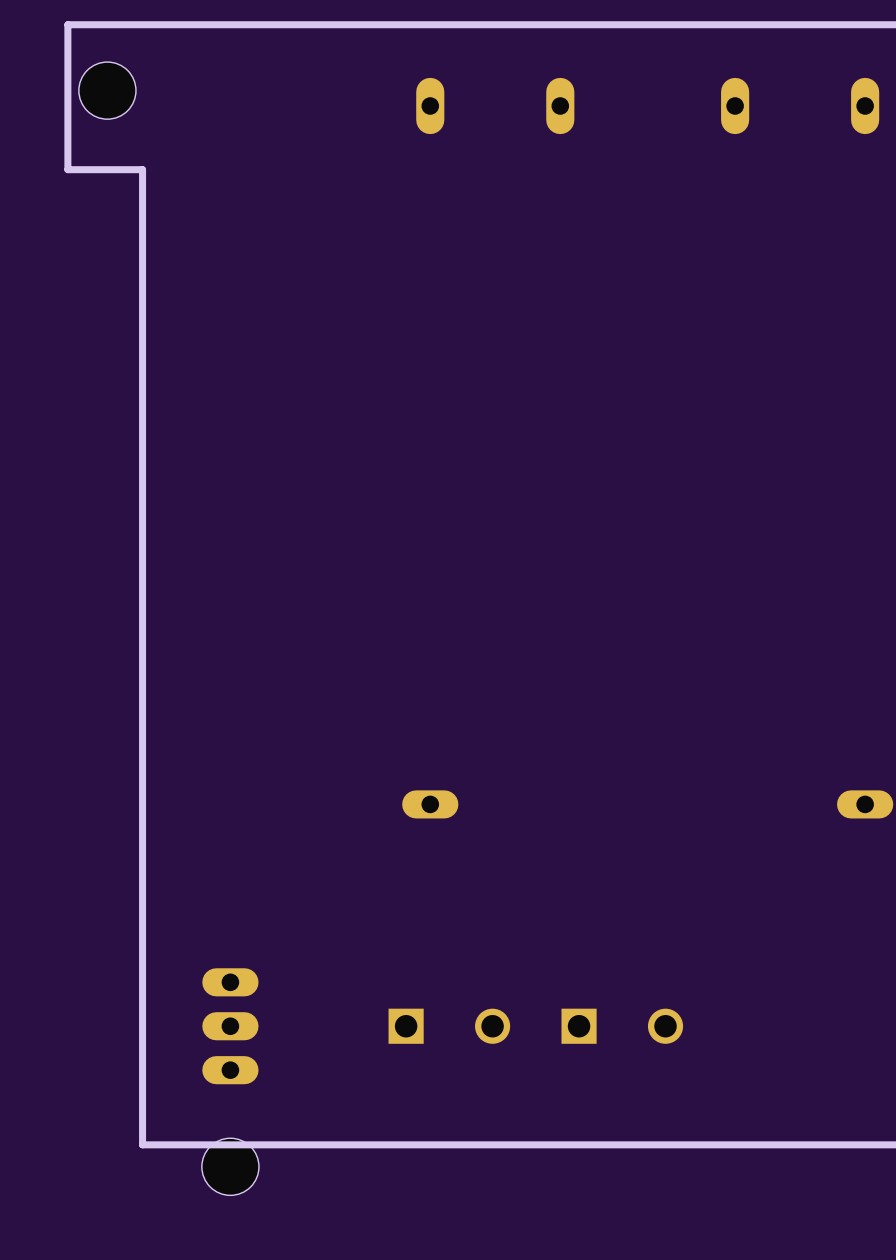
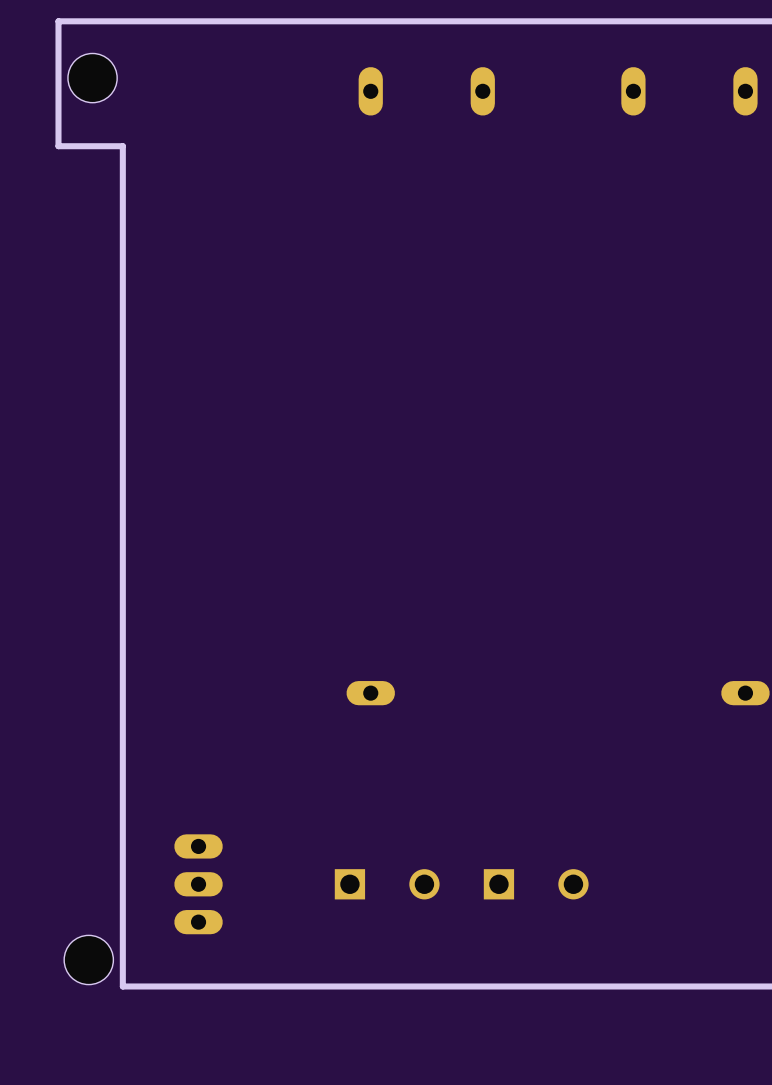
part position: (230, 1166) -> (88, 959)

